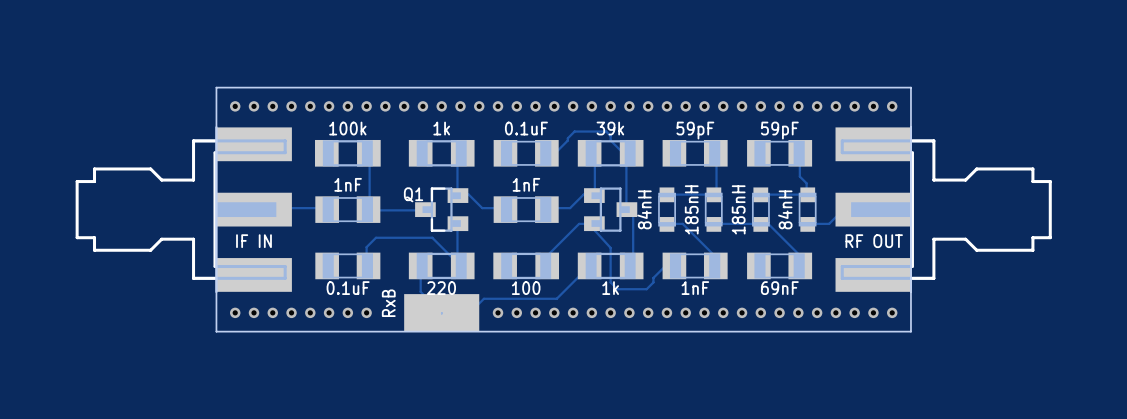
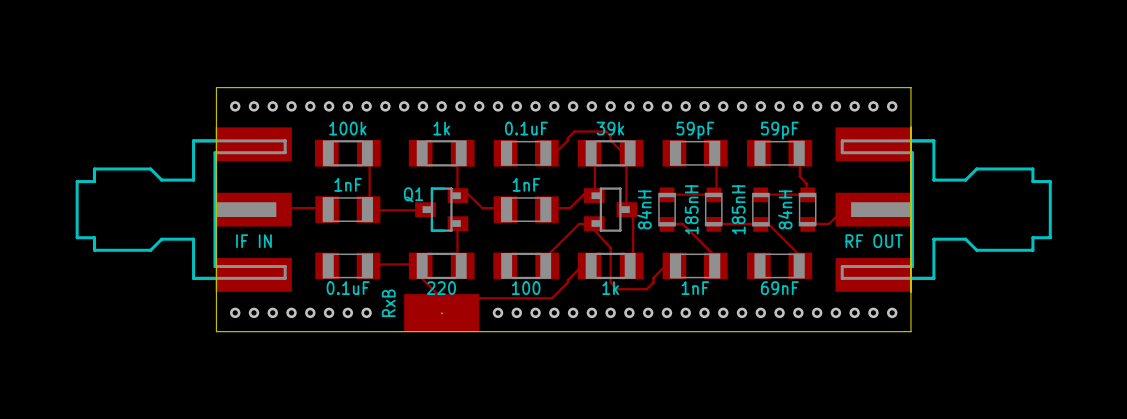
track: (368, 265) (366, 264) (366, 247) (376, 237) (432, 237) (460, 265) (462, 265) -> none
track: (420, 265) (420, 291) (441, 312) (469, 312) (483, 298) (556, 298) (589, 265) -> (368, 265) (419, 264) (421, 266) (421, 277) (448, 304) (441, 312) (455, 298) (552, 298) (581, 266) (589, 265)

